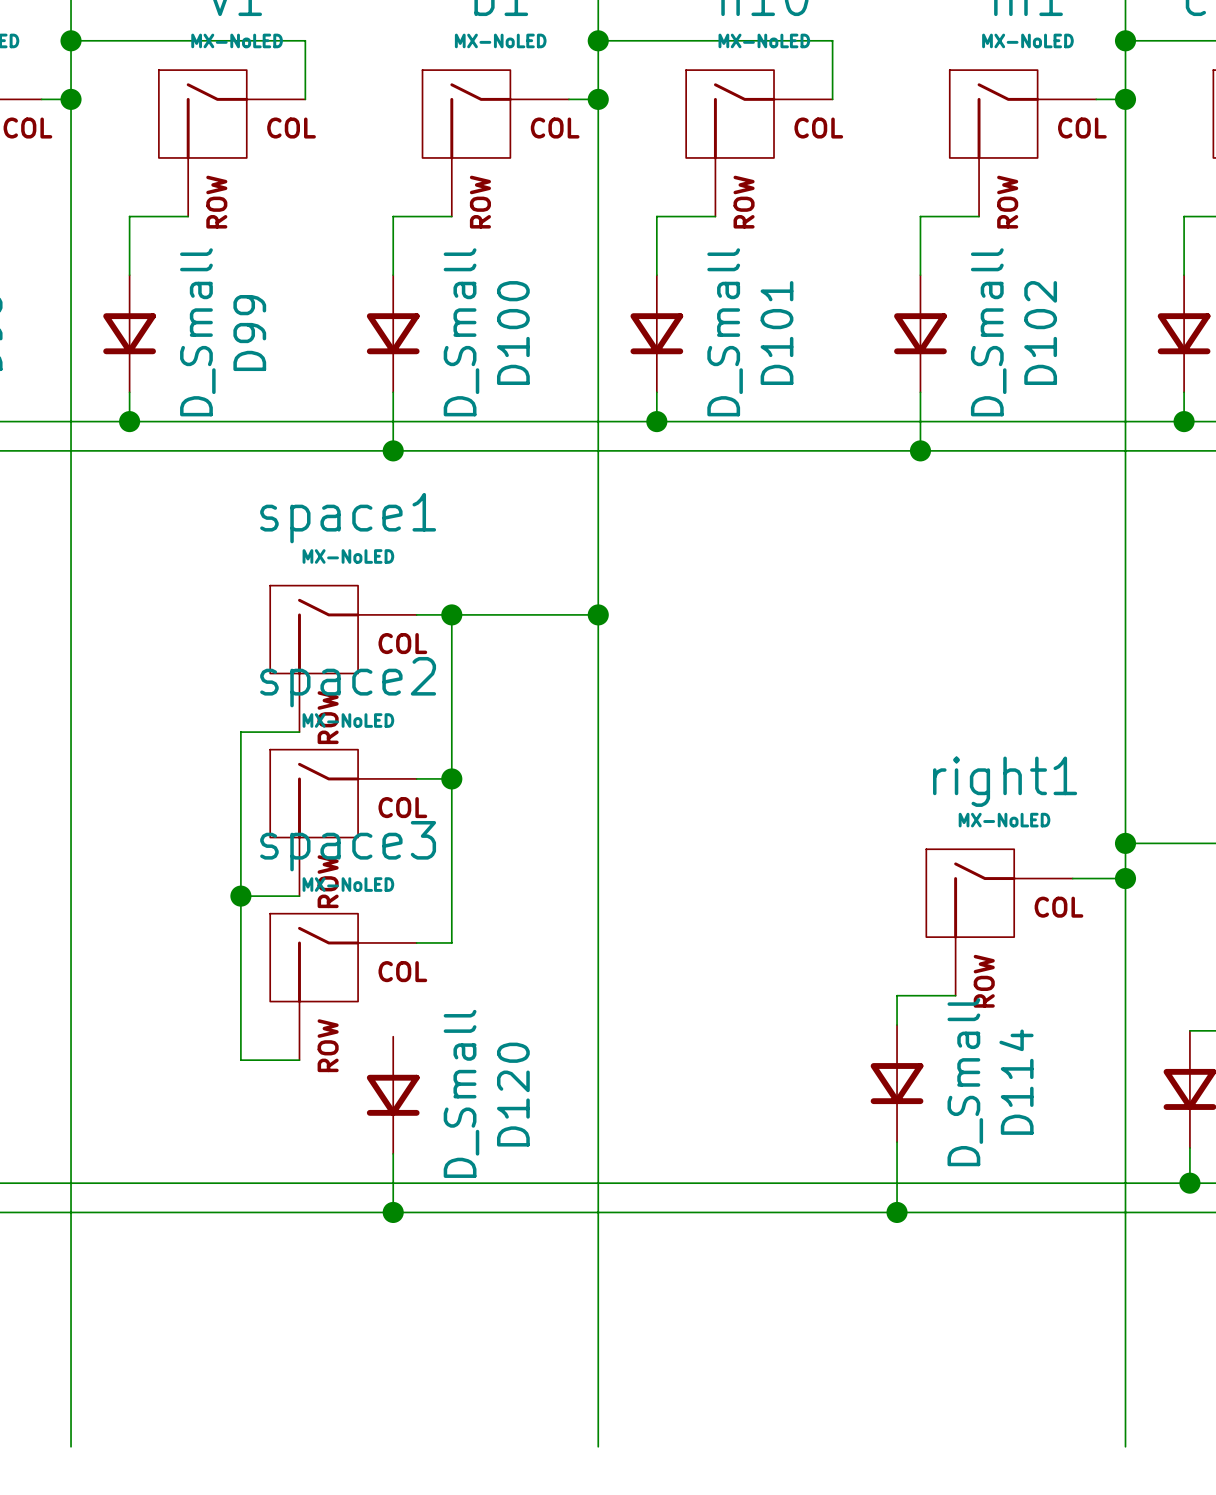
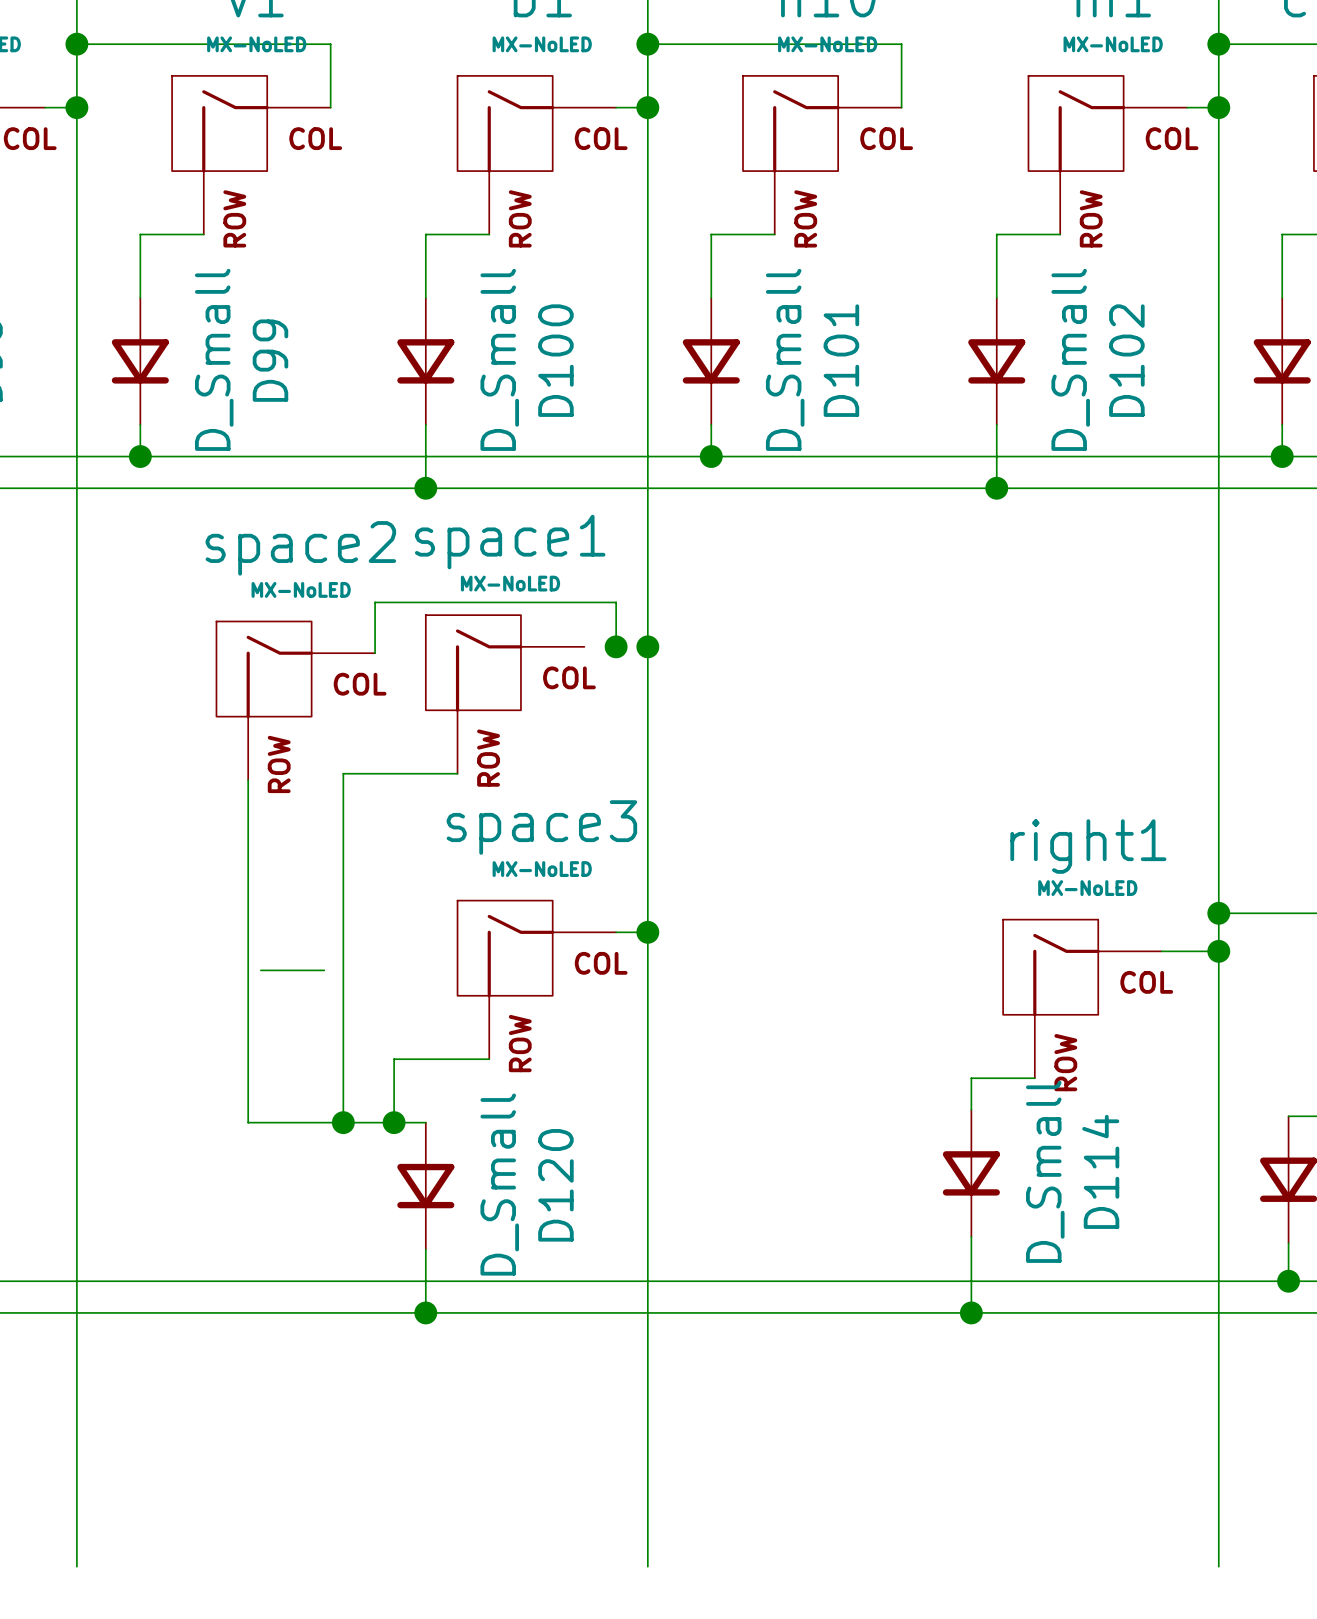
wire: none -> (616, 646) (616, 602) (375, 602) (375, 653)
junction: none -> (616, 646)
wire: (416, 614) (598, 614) -> none
wire: (451, 614) (451, 942) (416, 942) -> none
junction: (451, 614) -> none
junction position: (598, 614) -> (647, 646)
space1 position: (343, 658) -> (505, 694)
wire: none -> (457, 773) (343, 773) (343, 1122)
wire: none -> (248, 780) (248, 1122) (425, 1122)
wire: (299, 732) (240, 732) (240, 1060) (299, 1060) -> none
wire: (416, 778) (451, 778) -> none
junction: (451, 778) -> none
space2 position: (343, 822) -> (295, 700)
wire: none -> (616, 932) (647, 932)
junction: none -> (647, 932)
junction: (240, 896) -> none
wire: none -> (489, 1059) (394, 1059) (394, 1122)
space3 position: (343, 986) -> (536, 979)
junction: none -> (343, 1122)
junction: none -> (394, 1122)

